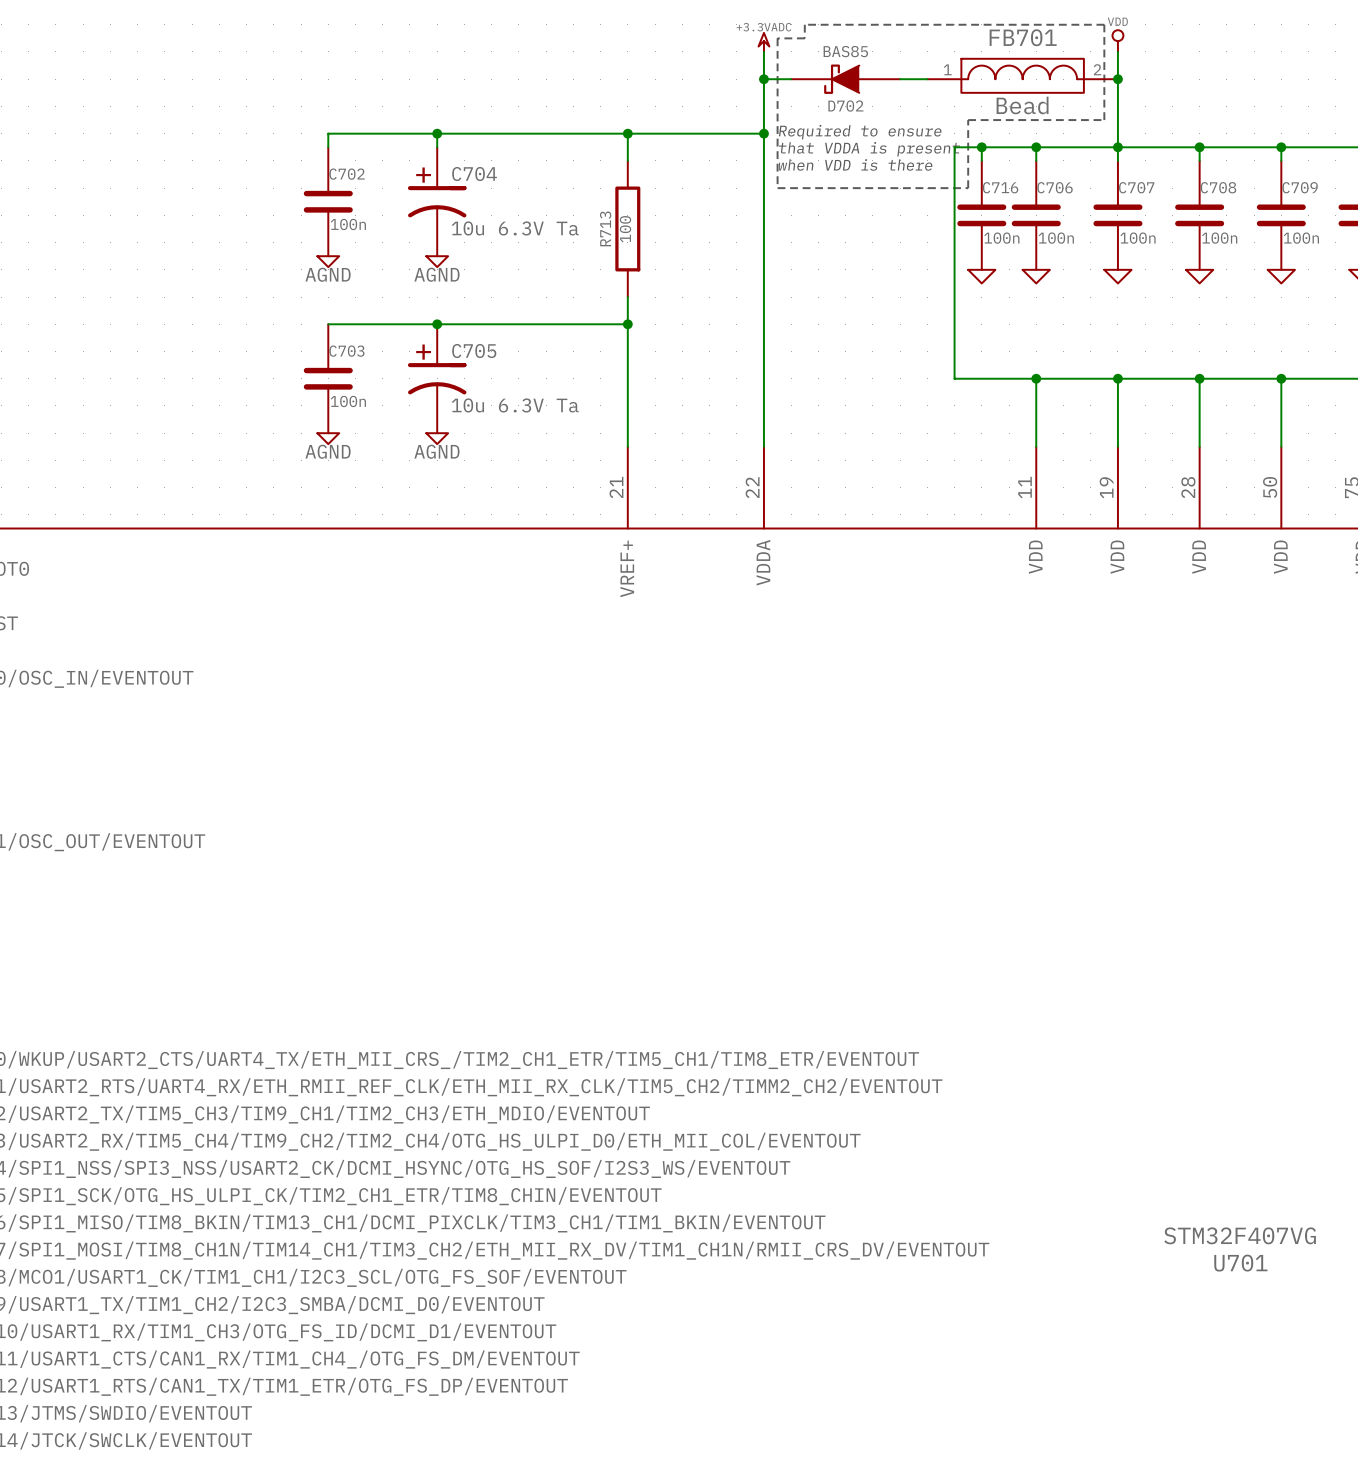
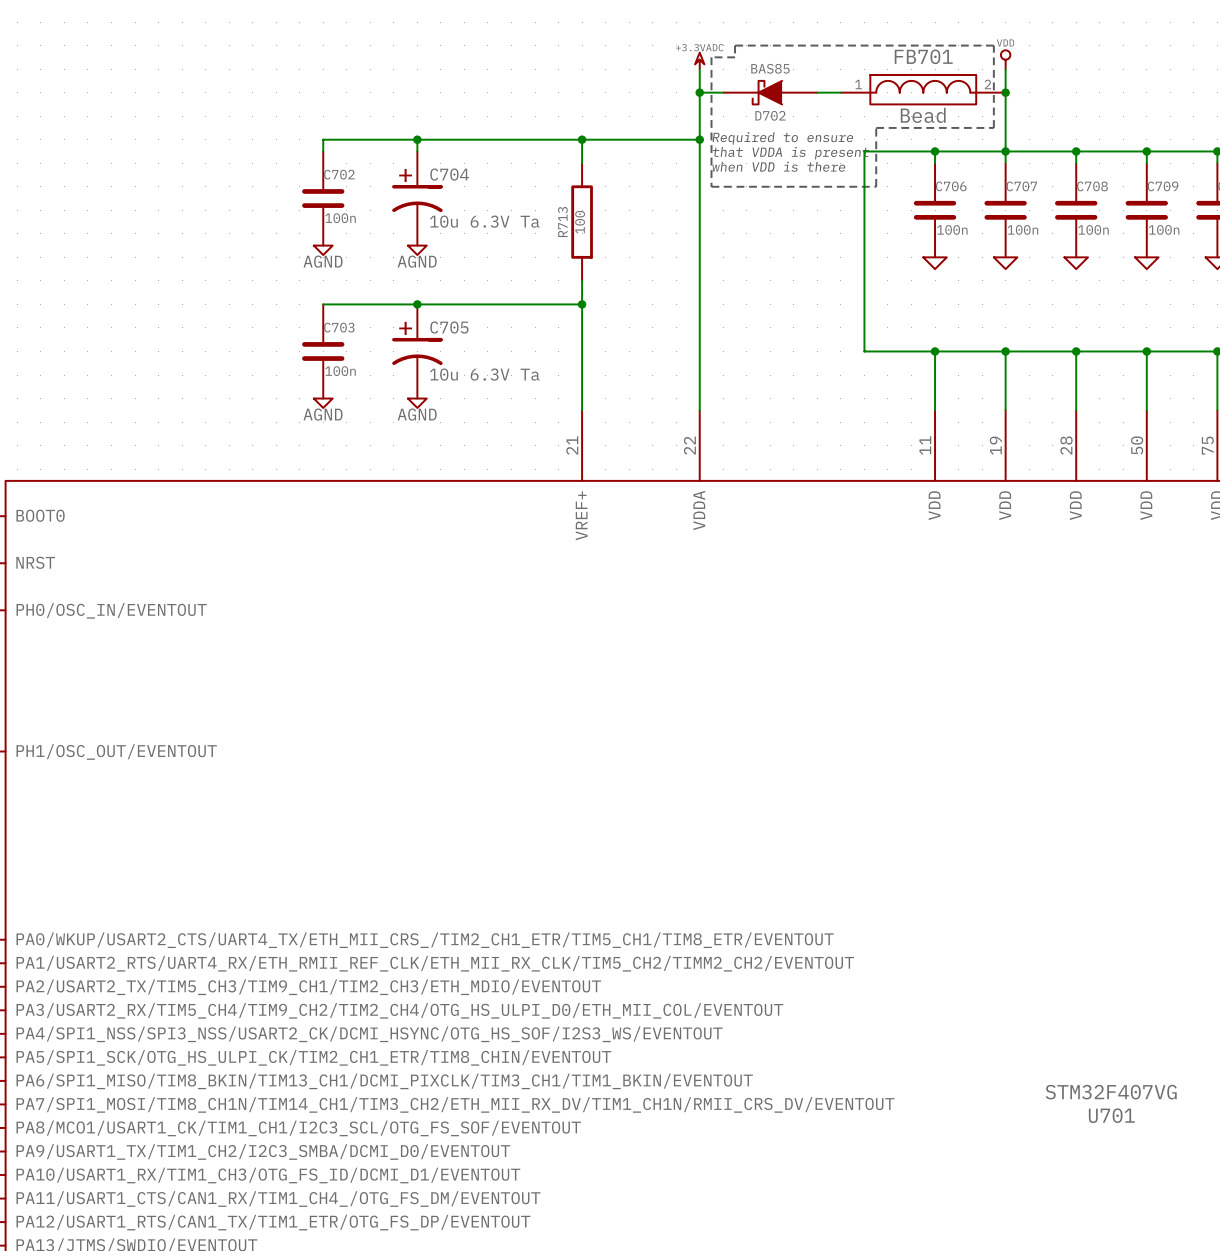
wire: (981, 147) (981, 160) -> none
junction: (981, 147) -> none
C716: 100n (981, 215) -> none
power symbol: (981, 276) -> none

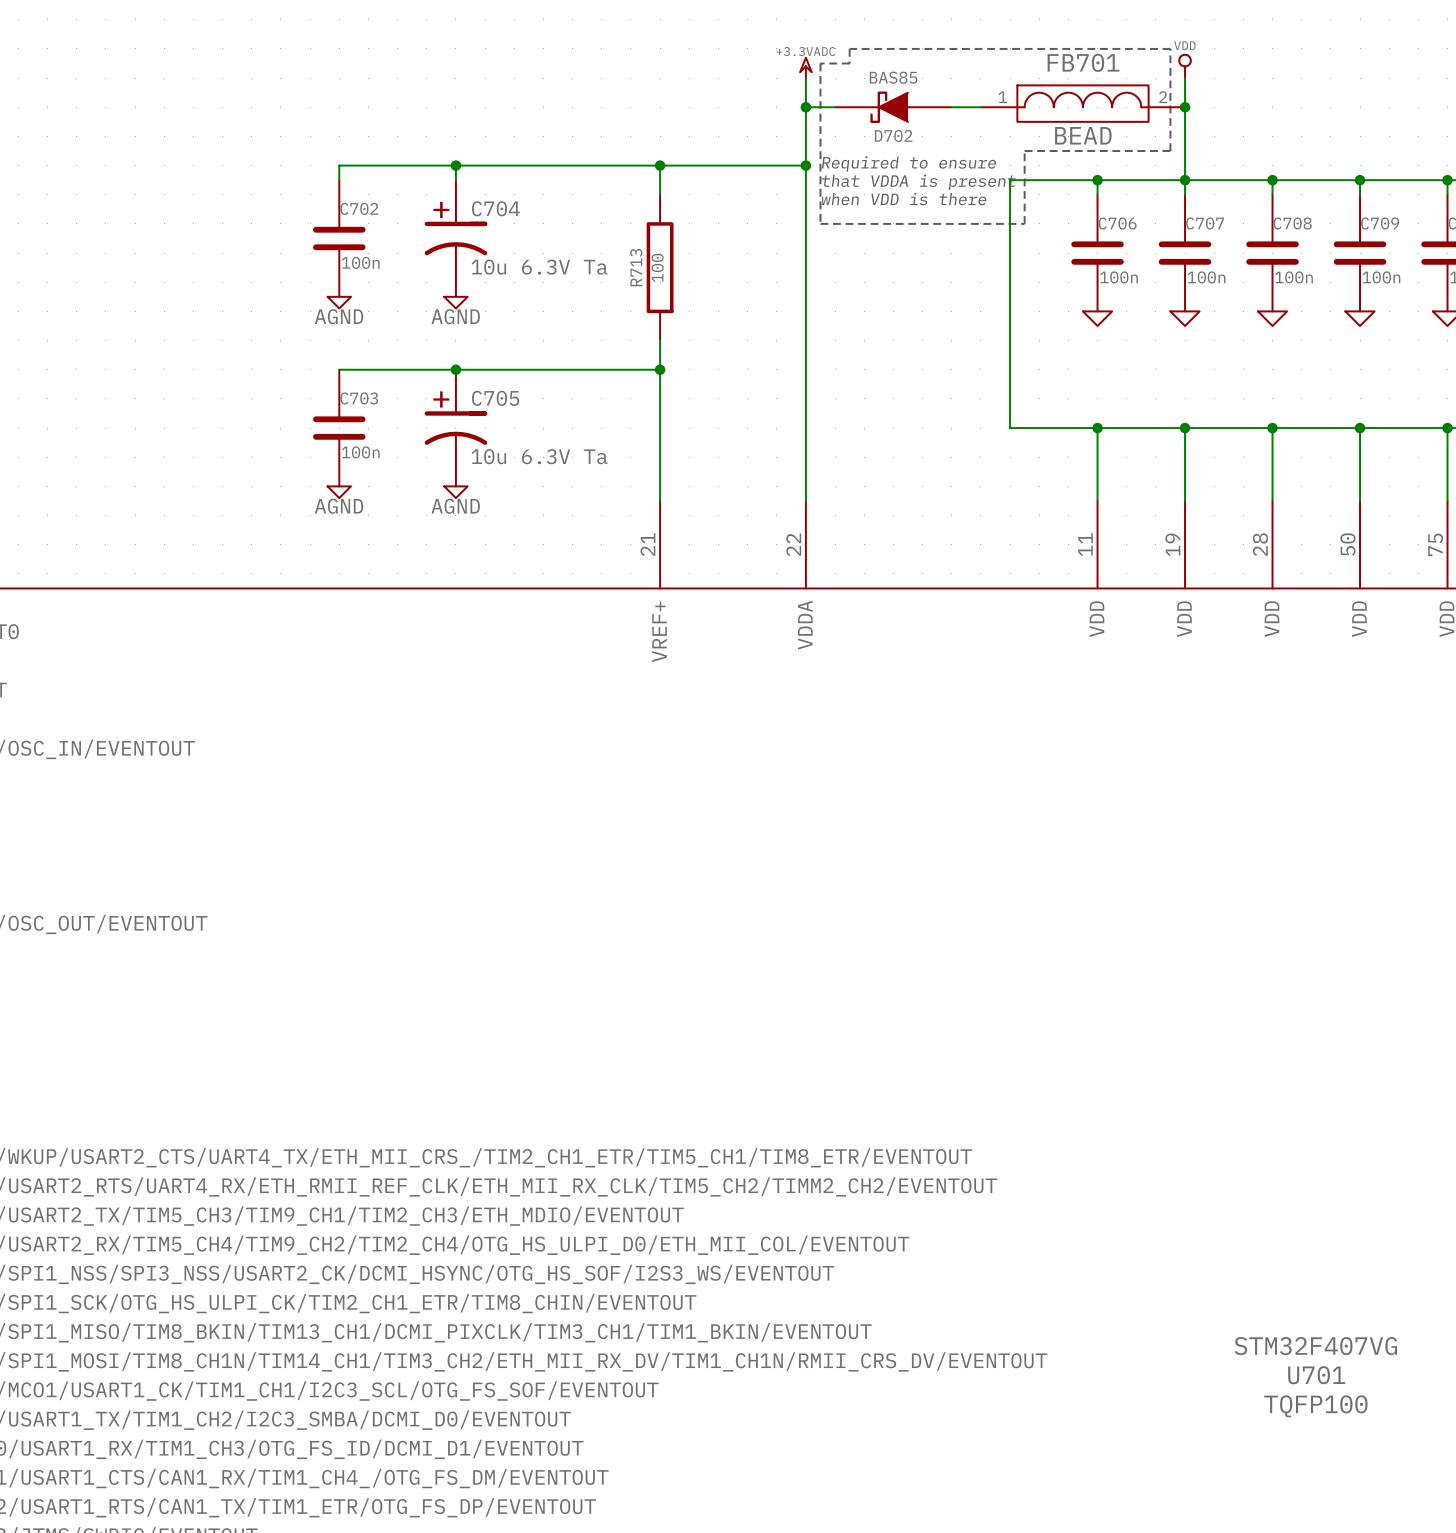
FB701 value: Bead (923, 115) -> BEAD (1083, 135)
U701 text: none -> TQFP100 (1315, 1406)

